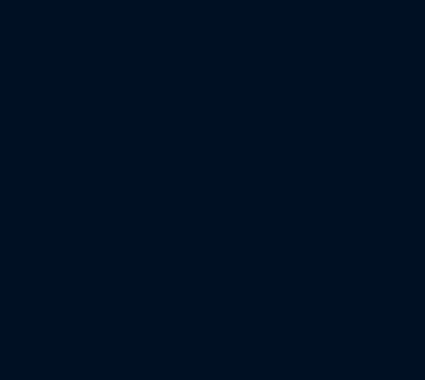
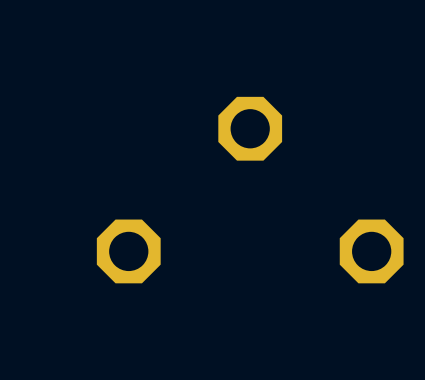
part: none -> (250, 190)

